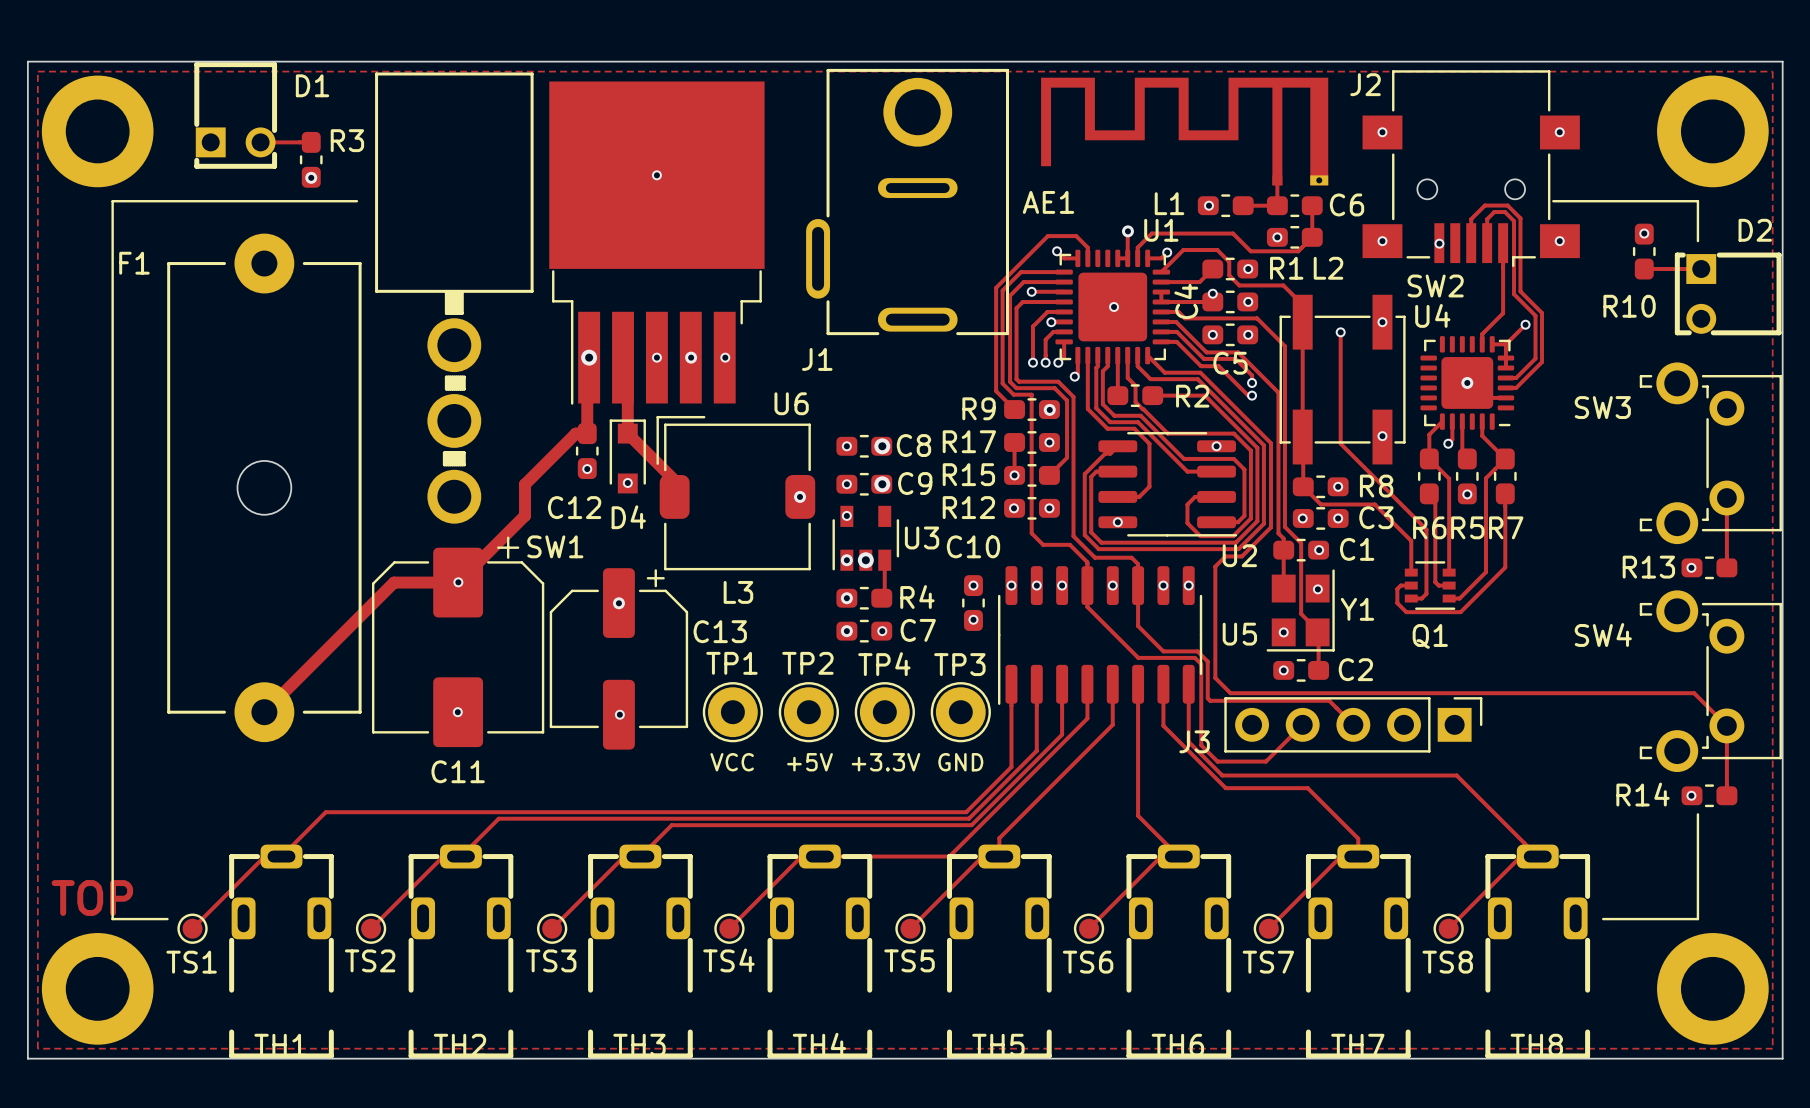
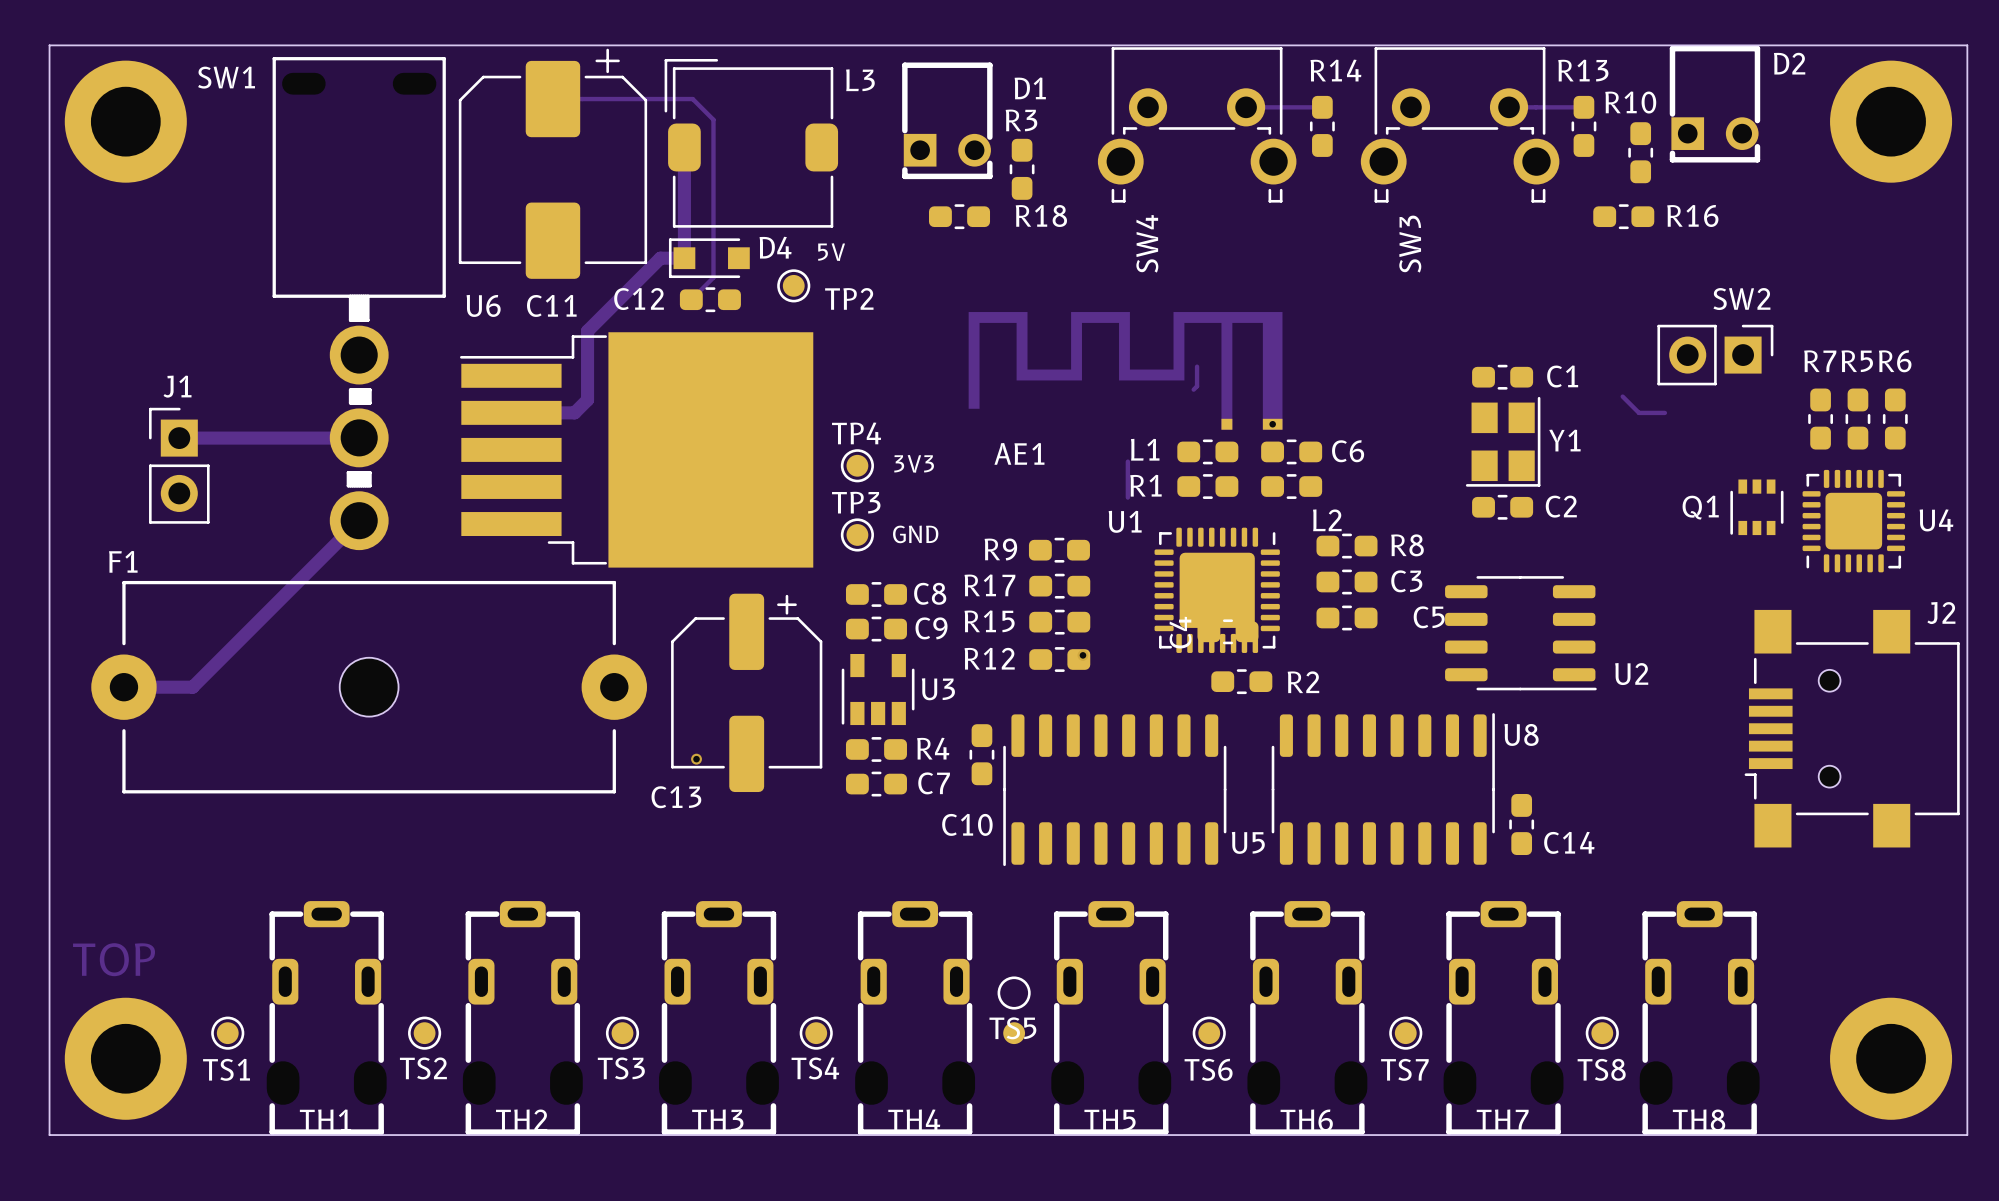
J1 footprint: [806, 68, 1009, 336] -> [149, 407, 210, 524]
zone outline: (37, 71) (1772, 71) (1772, 1048) (37, 1048) (37, 71) -> none
track: none -> (552, 99) (692, 99) (713, 119) (713, 277) (691, 299)
D1 position: (235, 115) -> (947, 120)
track: none -> (1246, 107) (1322, 107)
track: none -> (1509, 107) (1583, 107)
AE1 position: (1184, 131) -> (1125, 370)
via: (1382, 132) -> none
via: (1559, 132) -> none
R3 name position: R3 (347, 140) -> R3 (1021, 120)
track: (260, 142) (311, 142) -> none
track: none -> (684, 147) (684, 258) (660, 258) (587, 331) (587, 399) (574, 412) (511, 412)
R3 position: (311, 159) -> (1022, 169)
J2 rotation: 0° (1471, 168) -> 90° clockwise (1852, 728)
J2 position: (1471, 168) -> (1852, 728)
via: (656, 175) -> none
via: (311, 177) -> none
track: (1277, 180) (1277, 205) (1243, 205) -> none
line: (356, 201) (112, 201) (112, 919) (167, 919) -> none
line: (1553, 201) (1697, 201) (1697, 241) -> none
AE1 name position: AE1 (1048, 202) -> AE1 (1019, 453)
via: (1209, 205) -> none
L1 position: (1225, 205) -> (1207, 451)
C6 position: (1294, 205) -> (1291, 451)
track: (1312, 205) (1312, 237) (1298, 251) (1250, 251) (1233, 233) (1151, 233) (1137, 247) (1137, 258) -> none
R18: none -> (959, 216)
R16: none -> (1623, 216)
U1 name position: U1 (1161, 230) -> U1 (1125, 521)
D2 name position: D2 (1755, 230) -> D2 (1789, 63)
track: (1127, 231) (1127, 258) (1117, 258) -> none
via: (1127, 231) -> none
via: (1644, 233) -> none
via: (1277, 237) -> none
L2 position: (1294, 237) -> (1291, 486)
via: (1382, 241) -> none
via: (1559, 241) -> none
U6 rotation: 0° (656, 243) -> 90° clockwise (636, 449)
U6 position: (656, 243) -> (636, 449)
via: (1439, 243) -> none
track: (1471, 243) (1471, 219) (1484, 205) (1507, 205) (1520, 218) (1520, 291) (1542, 313) (1542, 362) (1516, 387) (1505, 387) -> none
track: (1487, 243) (1487, 219) (1494, 212) (1505, 212) (1514, 221) (1514, 294) (1535, 315) (1535, 358) (1516, 377) (1505, 377) -> none
track: (1503, 243) (1503, 313) (1482, 334) (1482, 344) -> none
text: none -> 5V (831, 252)
track: (1057, 251) (1064, 258) (1077, 258) -> none
via: (1057, 251) -> none
R10 position: (1644, 251) -> (1640, 152)
track: (1167, 252) (1161, 258) (1147, 258) -> none
via: (1167, 252) -> none
track: (1087, 258) (1087, 247) (1076, 236) (1047, 236) (996, 287) (996, 391) (1014, 409) -> none
F1 name position: F1 (134, 263) -> F1 (123, 561)
R1 name position: R1 (1286, 268) -> R1 (1145, 485)
track: (1212, 269) (1199, 282) (1161, 282) -> none
R1 position: (1230, 269) -> (1207, 486)
via: (1248, 269) -> none
track: (1644, 269) (1701, 269) -> none
track: (1064, 272) (1021, 272) (1002, 290) (1002, 383) (1013, 394) (1031, 394) (1031, 533) (1043, 544) (1069, 544) (1087, 562) (1087, 607) (1138, 657) (1194, 657) (1201, 664) (1201, 745) (1217, 761) (1265, 761) (1302, 724) -> none
track: (1161, 272) (1183, 250) (1217, 250) (1229, 261) (1229, 275) (1239, 285) (1283, 285) (1302, 304) (1303, 486) (1320, 504) (1374, 504) (1411, 540) (1411, 572) -> none
track: (1064, 282) (1023, 282) (1010, 295) (1010, 381) (1016, 388) (1054, 388) (1067, 400) (1067, 457) (1049, 475) -> none
SW2 name position: SW2 (1435, 285) -> SW2 (1741, 299)
track: (1031, 291) (1063, 291) -> none
via: (1031, 291) -> none
track: (1161, 292) (1161, 302) (1204, 302) (1212, 293) -> none
via: (1212, 293) -> none
D2 rotation: 0° (1728, 293) -> 90° counterclockwise (1714, 104)
D2 position: (1728, 293) -> (1714, 104)
SW2 footprint: [1279, 294, 1406, 465] -> [1657, 324, 1774, 386]
SW1 position: (454, 298) -> (359, 303)
C4 position: (1230, 301) -> (1227, 631)
via: (1248, 301) -> none
track: (1064, 302) (1022, 302) (1016, 308) (1016, 379) (1019, 381) (1058, 381) (1073, 396) (1073, 536) (1095, 557) (1131, 557) (1138, 564) (1138, 626) (1163, 651) (1197, 651) (1207, 661) (1207, 698) (1210, 700) (1329, 700) (1353, 724) -> none
U1 position: (1112, 306) -> (1217, 590)
via: (1114, 306) -> none
R10 name position: R10 (1629, 306) -> R10 (1630, 102)
track: (1064, 311) (1047, 311) (1032, 326) (1032, 362) -> none
track: (1161, 311) (1178, 311) (1184, 318) (1257, 318) (1284, 346) (1284, 527) (1301, 543) (1301, 613) (1318, 633) (1318, 670) -> none
track: (1161, 321) (1176, 321) (1206, 352) (1238, 352) (1278, 392) (1278, 533) (1283, 538) (1283, 588) -> none
via: (1051, 322) -> none
via: (1382, 322) -> none
track: (1525, 324) (1505, 344) -> none
via: (1525, 324) -> none
track: (1064, 331) (1053, 331) (1045, 339) (1045, 362) -> none
track: (1161, 331) (1176, 331) (1203, 358) (1235, 358) (1252, 375) (1252, 382) -> none
track: (1340, 332) (1340, 443) (1426, 529) (1426, 593) (1421, 598) (1411, 598) -> none
via: (1340, 332) -> none
via: (1212, 334) -> none
C5 position: (1230, 334) -> (1346, 618)
via: (1248, 334) -> none
track: (1064, 341) (1064, 356) (1058, 362) -> none
track: (1161, 341) (1176, 341) (1201, 366) (1218, 366) (1248, 395) (1252, 395) -> none
track: (1492, 344) (1505, 344) -> none
track: (1505, 344) (1505, 368) -> none
track: (1087, 355) (1087, 408) (1107, 428) (1134, 428) (1149, 443) (1149, 486) (1139, 496) (1117, 496) -> none
track: (1097, 355) (1096, 408) (1110, 422) (1138, 422) (1187, 471) (1216, 471) -> none
track: (1107, 355) (1107, 366) (1102, 371) (1102, 404) (1114, 415) (1140, 415) (1183, 458) (1233, 458) (1244, 469) (1244, 515) (1237, 522) (1216, 522) -> none
track: (1117, 355) (1117, 395) -> none
track: (1127, 355) (1127, 377) (1135, 385) (1135, 401) (1167, 433) (1233, 433) (1250, 450) (1250, 518) (1233, 536) (1200, 536) (1187, 523) (1187, 504) (1195, 496) (1216, 496) -> none
track: (1137, 355) (1137, 366) (1150, 379) (1197, 379) (1263, 445) (1263, 523) (1238, 549) (1098, 549) (1084, 535) (1084, 474) (1105, 453) (1110, 453) (1117, 446) -> none
track: (1147, 355) (1164, 372) (1200, 372) (1271, 443) (1271, 527) (1241, 556) (1225, 556) (1215, 566) (1215, 678) (1230, 693) (1694, 693) (1726, 725) (1726, 795) -> none
track: (589, 357) (587, 359) (587, 433) (575, 433) (525, 484) (525, 515) (458, 582) (394, 582) (264, 712) -> none
via: (589, 357) -> none
via: (656, 357) -> none
via: (691, 357) -> none
via: (725, 357) -> none
J1 name position: J1 (817, 359) -> J1 (177, 386)
via: (1032, 362) -> none
via: (1045, 362) -> none
via: (1058, 362) -> none
C5 name position: C5 (1230, 363) -> C5 (1429, 617)
via: (1074, 376) -> none
via: (1252, 382) -> none
U4 rotation: 0° (1467, 382) -> 90° clockwise (1853, 521)
U4 position: (1467, 382) -> (1853, 521)
via: (1467, 382) -> none
R2 position: (1135, 395) -> (1241, 681)
track: (1152, 395) (1205, 395) (1257, 447) (1257, 521) (1235, 542) (1101, 542) (1091, 532) (1091, 476) (1096, 471) (1117, 471) -> none
via: (1252, 395) -> none
U6 name position: U6 (791, 403) -> U6 (483, 305)
R9 position: (1032, 409) -> (1059, 550)
via: (1049, 409) -> none
track: none -> (179, 438) (359, 438)
track: (1442, 421) (1429, 434) (1429, 458) (1449, 478) (1449, 572) -> none
track: (1452, 421) (1452, 439) (1448, 443) -> none
track: (1462, 421) (1462, 453) (1467, 458) -> none
track: (1482, 421) (1482, 435) (1505, 458) (1485, 478) (1485, 572) (1459, 598) (1449, 598) -> none
via: (1382, 436) -> none
R17 position: (1032, 442) -> (1059, 586)
via: (1049, 442) -> none
via: (1448, 443) -> none
text: none -> 3V3 (914, 463)
via: (846, 446) -> none
C8 position: (864, 446) -> (876, 594)
via: (882, 446) -> none
via: (1216, 446) -> none
C12 rotation: 0° (587, 451) -> 90° clockwise (710, 299)
C12 position: (587, 451) -> (710, 299)
SW3 rotation: 0° (1710, 453) -> 90° counterclockwise (1460, 124)
SW3 position: (1710, 453) -> (1460, 124)
D4 rotation: 0° (627, 456) -> 90° counterclockwise (709, 258)
D4 position: (627, 456) -> (709, 258)
via: (587, 469) -> none
via: (1014, 475) -> none
R15 position: (1032, 475) -> (1059, 622)
R6 position: (1429, 476) -> (1895, 419)
R5 position: (1467, 476) -> (1857, 419)
R7 position: (1505, 476) -> (1820, 419)
via: (627, 483) -> none
via: (846, 484) -> none
C9 position: (864, 484) -> (876, 629)
via: (882, 484) -> none
U2 position: (1167, 484) -> (1520, 633)
R8 position: (1320, 486) -> (1346, 546)
via: (1338, 486) -> none
F1 rotation: 0° (264, 487) -> 90° clockwise (369, 687)
L3 position: (735, 493) -> (751, 143)
track: (1429, 493) (1435, 499) (1435, 582) (1438, 585) (1449, 585) -> none
track: (1505, 493) (1505, 567) (1460, 612) (1406, 612) (1397, 603) (1397, 589) (1400, 585) (1411, 585) -> none
via: (1467, 494) -> none
track: none -> (359, 520) (192, 687) (123, 687)
via: (800, 496) -> none
track: (1726, 498) (1726, 567) -> none
via: (1014, 508) -> none
R12 position: (1032, 508) -> (1059, 659)
via: (1049, 508) -> none
via: (846, 515) -> none
via: (1302, 518) -> none
C3 position: (1320, 518) -> (1346, 582)
via: (1338, 518) -> none
via: (1117, 522) -> none
R6 name position: R6 (1429, 527) -> R6 (1895, 361)
R5 name position: R5 (1467, 527) -> R5 (1857, 361)
R7 name position: R7 (1506, 527) -> R7 (1820, 361)
U3 position: (865, 538) -> (878, 689)
SW1 name position: SW1 (555, 546) -> SW1 (226, 77)
C10 name position: C10 (973, 546) -> C10 (967, 824)
C1 position: (1301, 550) -> (1502, 377)
via: (1319, 550) -> none
U2 name position: U2 (1239, 555) -> U2 (1631, 674)
via: (846, 560) -> none
via: (865, 560) -> none
track: (884, 560) (884, 595) (881, 598) -> none
via: (1691, 567) -> none
R13 rotation: 0° (1709, 567) -> 90° clockwise (1583, 126)
R13 position: (1709, 567) -> (1583, 126)
via: (458, 582) -> none
via: (973, 585) -> none
via: (1011, 585) -> none
via: (1036, 585) -> none
via: (1062, 585) -> none
via: (1112, 585) -> none
via: (1163, 585) -> none
via: (1188, 585) -> none
Q1 rotation: 0° (1430, 585) -> 90° clockwise (1756, 507)
Q1 position: (1430, 585) -> (1756, 507)
via: (1317, 589) -> none
L3 name position: L3 (738, 592) -> L3 (860, 80)
via: (846, 598) -> none
R4 position: (864, 598) -> (876, 749)
via: (618, 603) -> none
C10 position: (973, 603) -> (981, 754)
Y1 position: (1300, 610) -> (1503, 441)
C13 name position: C13 (720, 631) -> C13 (676, 797)
via: (846, 631) -> none
C7 position: (864, 631) -> (876, 784)
via: (882, 631) -> none
via: (1283, 632) -> none
U5 name position: U5 (1239, 634) -> U5 (1248, 842)
U5 position: (1100, 635) -> (1114, 790)
C11 position: (458, 641) -> (552, 163)
C13 position: (618, 658) -> (746, 692)
TP2 name position: TP2 (807, 663) -> TP2 (849, 298)
via: (1283, 670) -> none
C2 position: (1301, 670) -> (1502, 507)
SW4 rotation: 0° (1710, 681) -> 90° counterclockwise (1197, 124)
SW4 position: (1710, 681) -> (1197, 124)
TP2 footprint: [778, 682, 839, 743] -> [777, 269, 811, 303]
TP4 footprint: [854, 682, 915, 743] -> [840, 449, 874, 483]
TP3 footprint: [930, 682, 991, 743] -> [840, 518, 874, 552]
track: (1011, 684) (1011, 767) (966, 812) (325, 812) (281, 856) (264, 856) (192, 928) -> none
track: (1036, 684) (1036, 750) (968, 818) (498, 818) (460, 856) (443, 856) (371, 928) -> none
track: (1062, 684) (1062, 734) (971, 825) (671, 825) (640, 856) (624, 856) (552, 928) -> none
track: (1087, 684) (1087, 718) (949, 856) (801, 856) (729, 928) -> none
track: (1112, 684) (1112, 724) (999, 838) (999, 856) (982, 856) (910, 928) -> none
track: (1138, 684) (1138, 815) (1178, 856) (1161, 856) (1089, 928) -> none
track: (1163, 684) (1163, 725) (1225, 788) (1307, 788) (1358, 838) (1358, 856) (1341, 856) (1268, 928) -> none
track: (1188, 684) (1188, 741) (1222, 775) (1456, 775) (1537, 856) (1520, 856) (1448, 928) -> none
via: (457, 712) -> none
TP1: (732, 712) -> none
J3: (1353, 724) -> none
U8: none -> (1383, 788)
text: VCC (732, 762) -> none
text: +5V (810, 762) -> none
text: +3.3V (885, 762) -> none
text position: GND (960, 762) -> GND (915, 534)
C14: none -> (1521, 824)
via: (1691, 795) -> none
R14 rotation: 0° (1709, 795) -> 90° clockwise (1322, 126)
R14 position: (1709, 795) -> (1322, 126)
line: (1697, 814) (1697, 919) (1603, 919) -> none
TS5 footprint: [895, 913, 926, 944] -> [997, 976, 1031, 1045]
TS1 position: (192, 928) -> (227, 1033)
TS2 position: (371, 928) -> (424, 1033)
TS3 position: (552, 928) -> (622, 1033)
TS4 position: (729, 928) -> (816, 1033)
TS6 position: (1089, 928) -> (1209, 1033)
TS7 position: (1268, 928) -> (1405, 1033)
TS8 position: (1448, 928) -> (1602, 1033)

